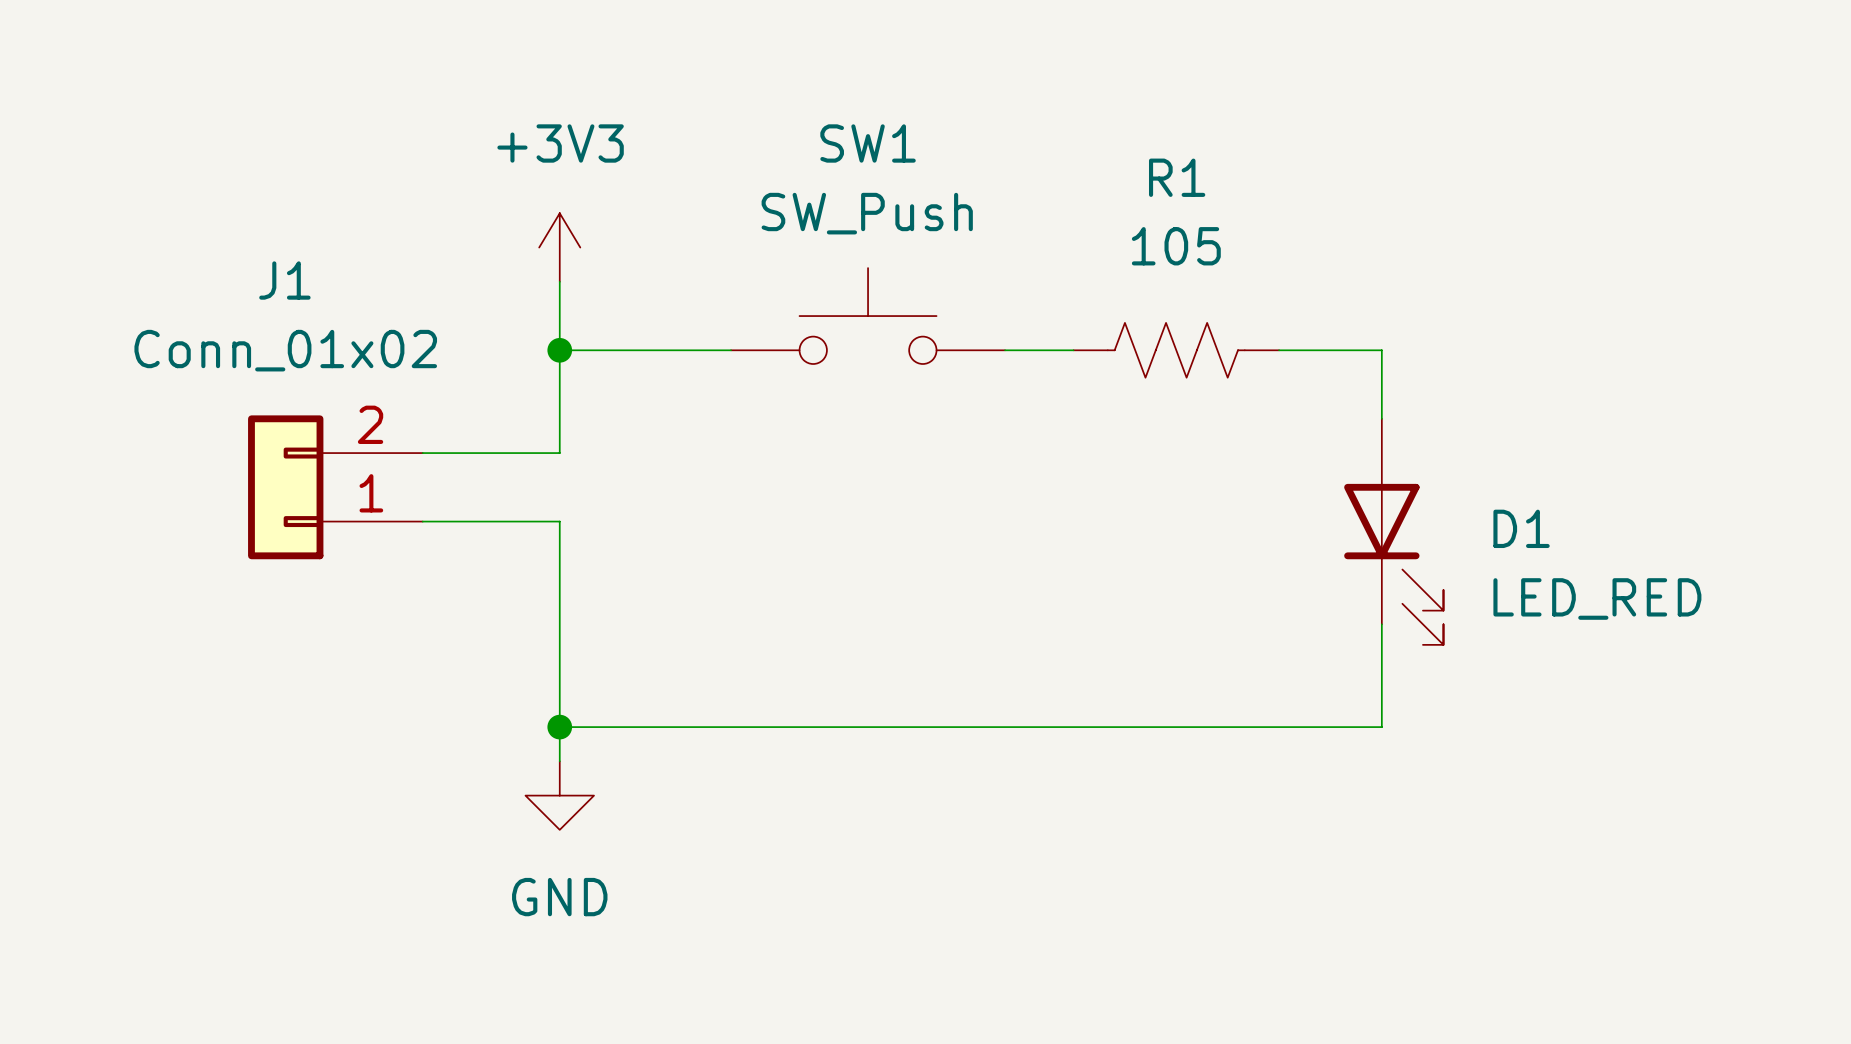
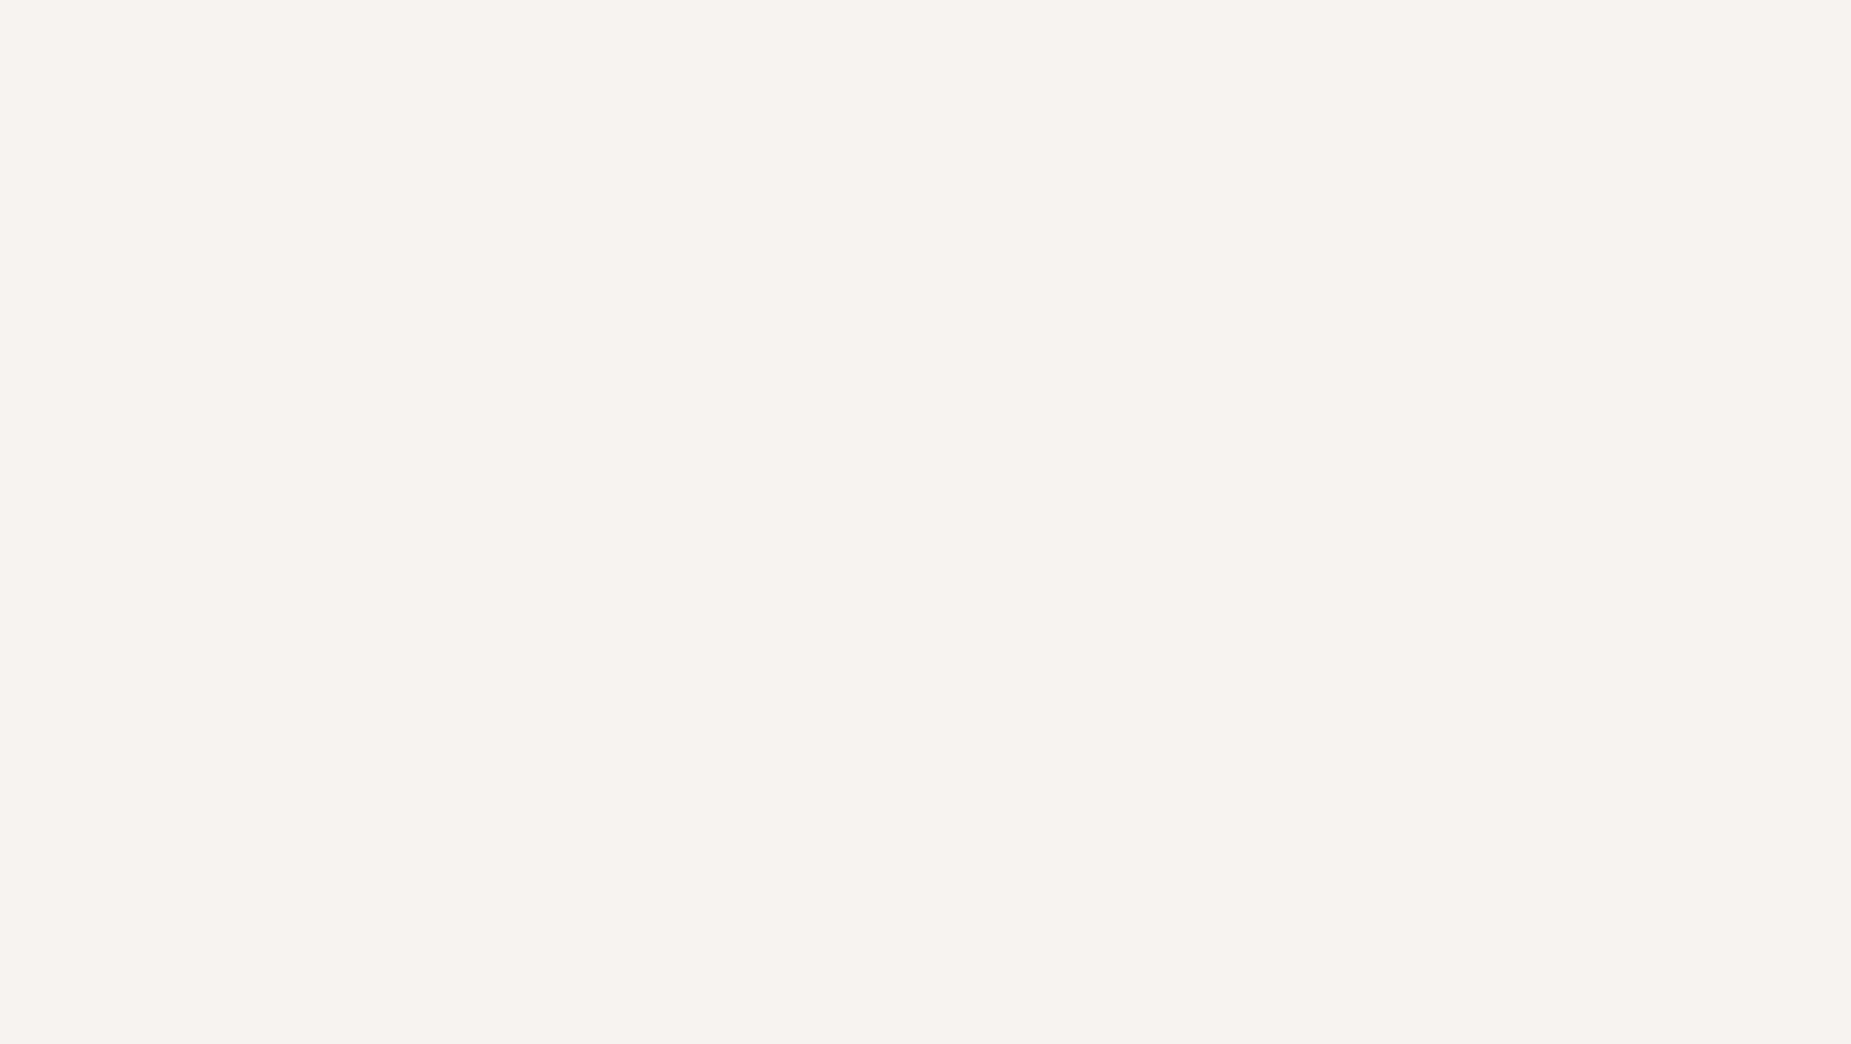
power symbol: +3V3 (559, 247) -> none
wire: (559, 281) (559, 453) (422, 453) -> none
SW1: SW_Push (868, 316) -> none
wire: (559, 350) (731, 350) -> none
junction: (559, 350) -> none
wire: (1005, 350) (1073, 350) -> none
R1: 105 (1176, 350) -> none
wire: (1279, 350) (1381, 350) (1381, 418) -> none
J1: Conn_01x02 (335, 487) -> none
wire: (422, 521) (559, 521) (559, 761) -> none
D1: LED_RED (1393, 531) -> none
wire: (1381, 624) (1381, 727) (559, 727) -> none
junction: (559, 727) -> none
power symbol: GND (559, 795) -> none

